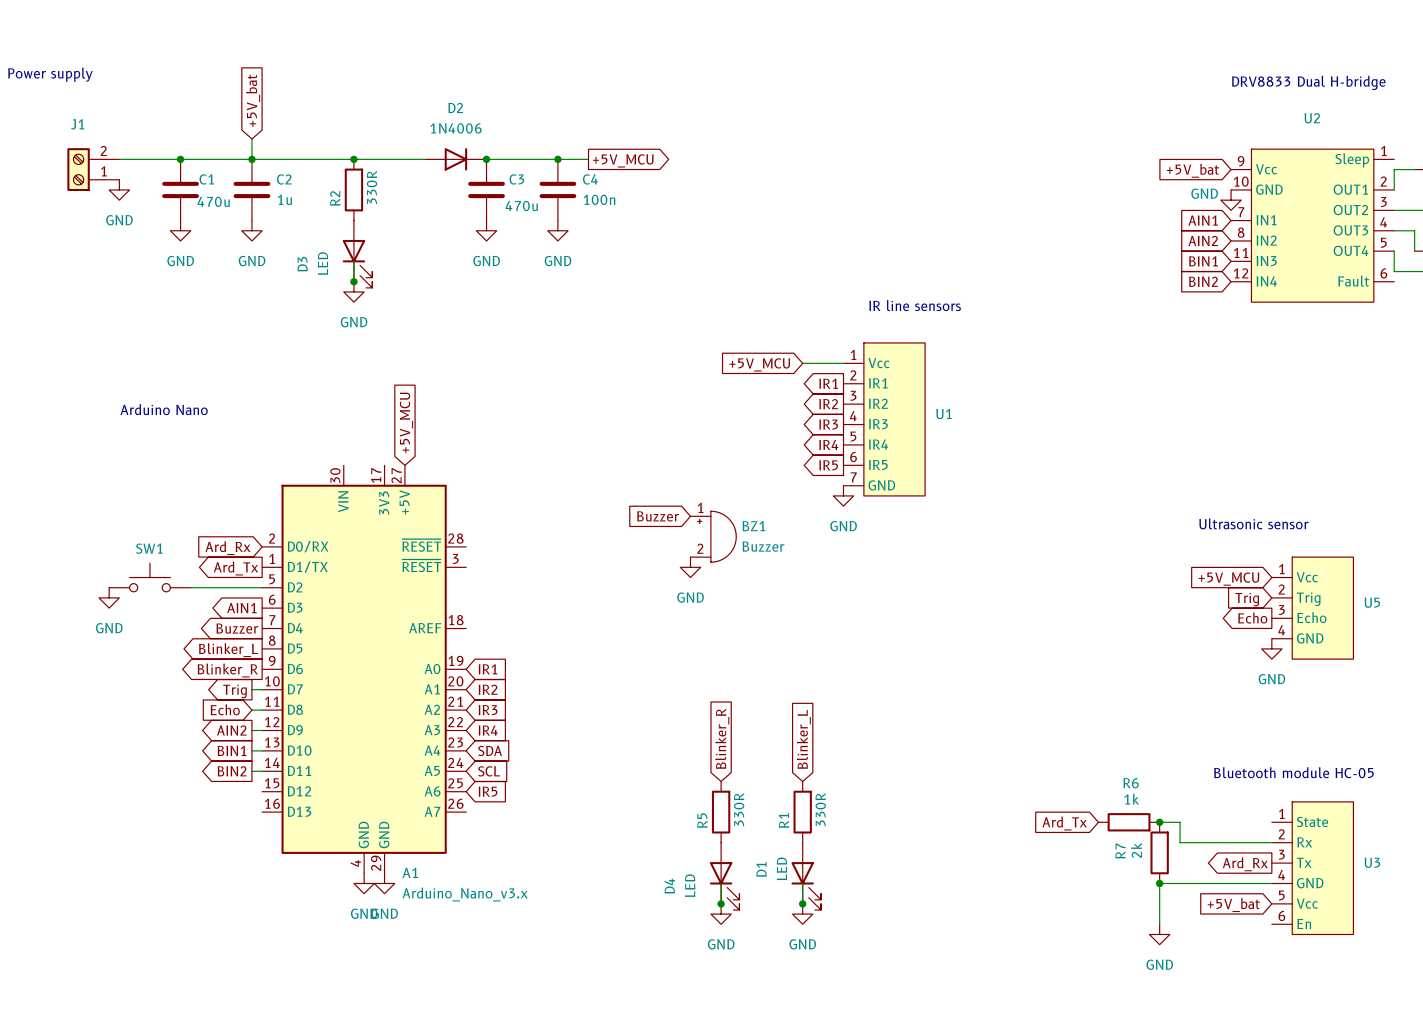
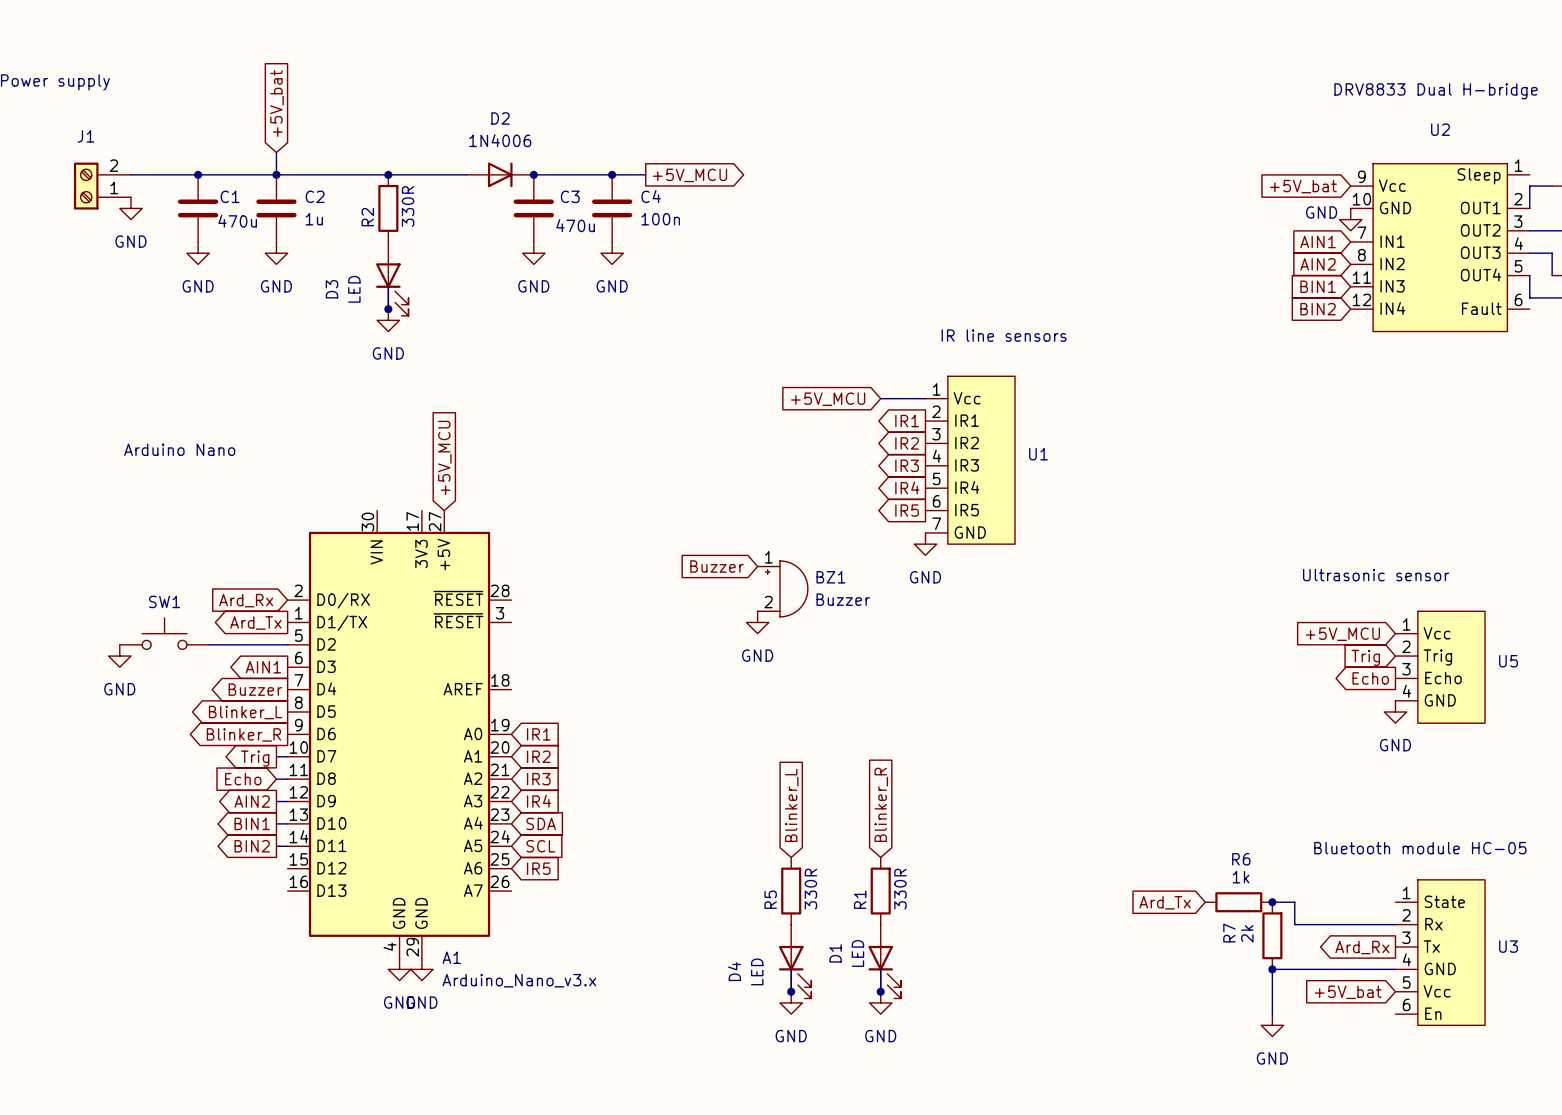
global label: Blinker_R (722, 738) -> Blinker_L (791, 805)
global label: Blinker_L (803, 739) -> Blinker_R (881, 804)

